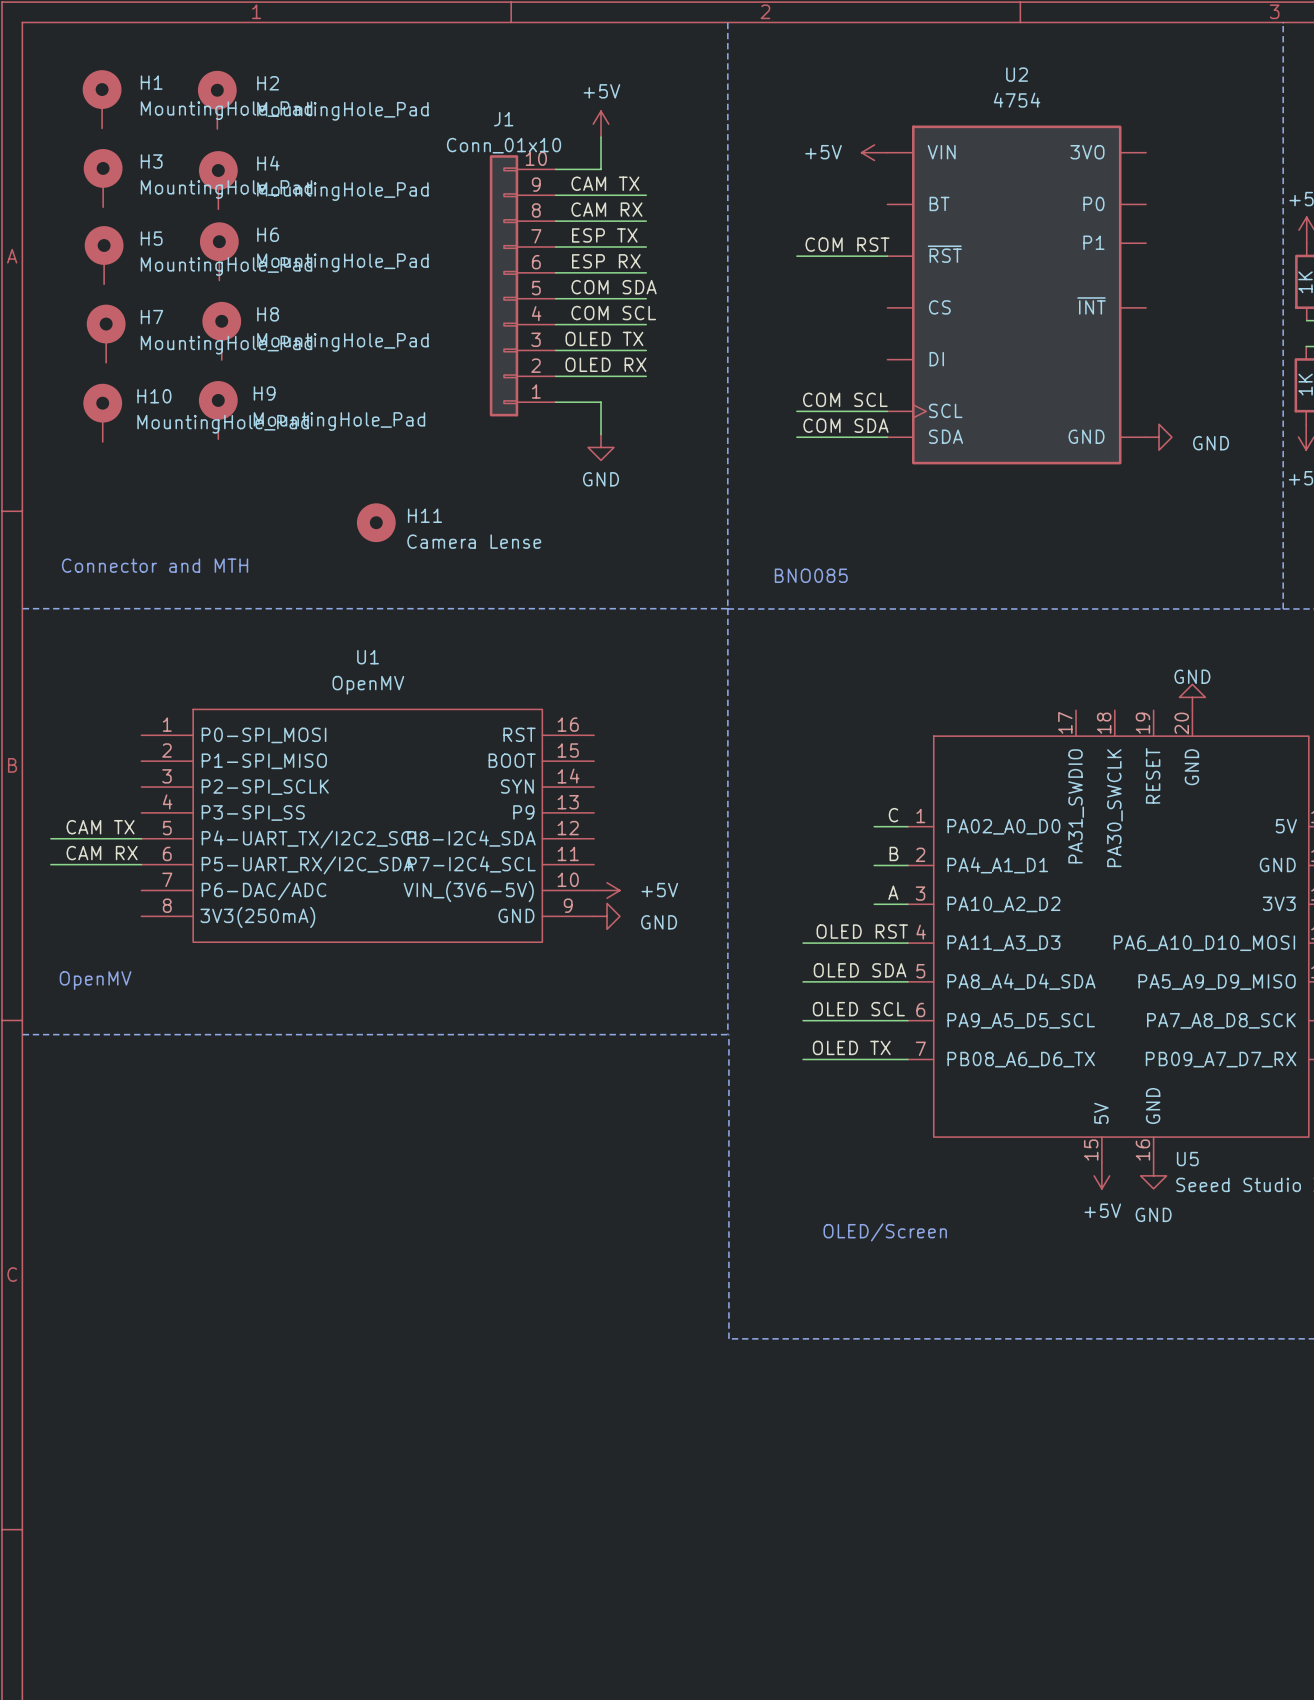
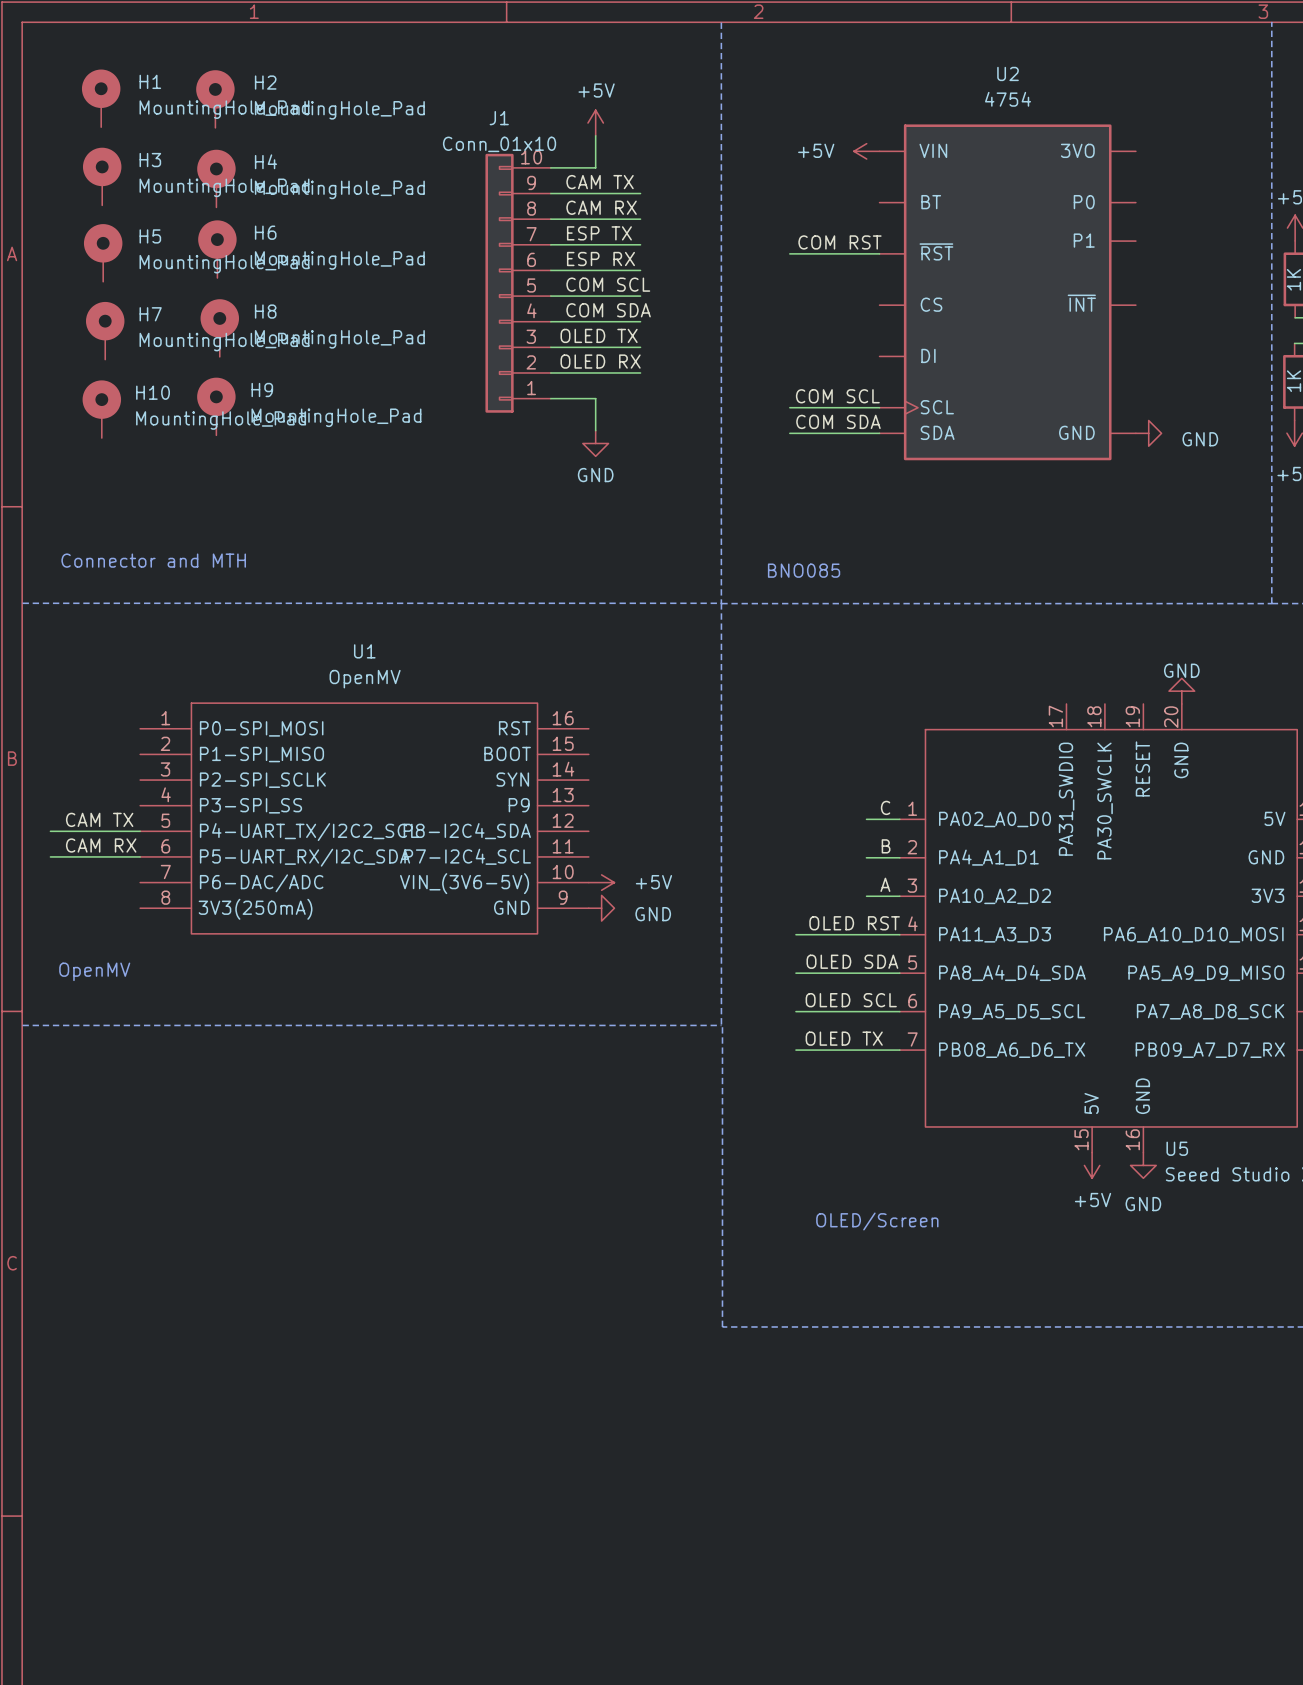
label: COM SDA (614, 287) -> COM SCL (608, 284)
label: COM SCL (613, 313) -> COM SDA (608, 310)
H11: Camera Lense (376, 522) -> none

